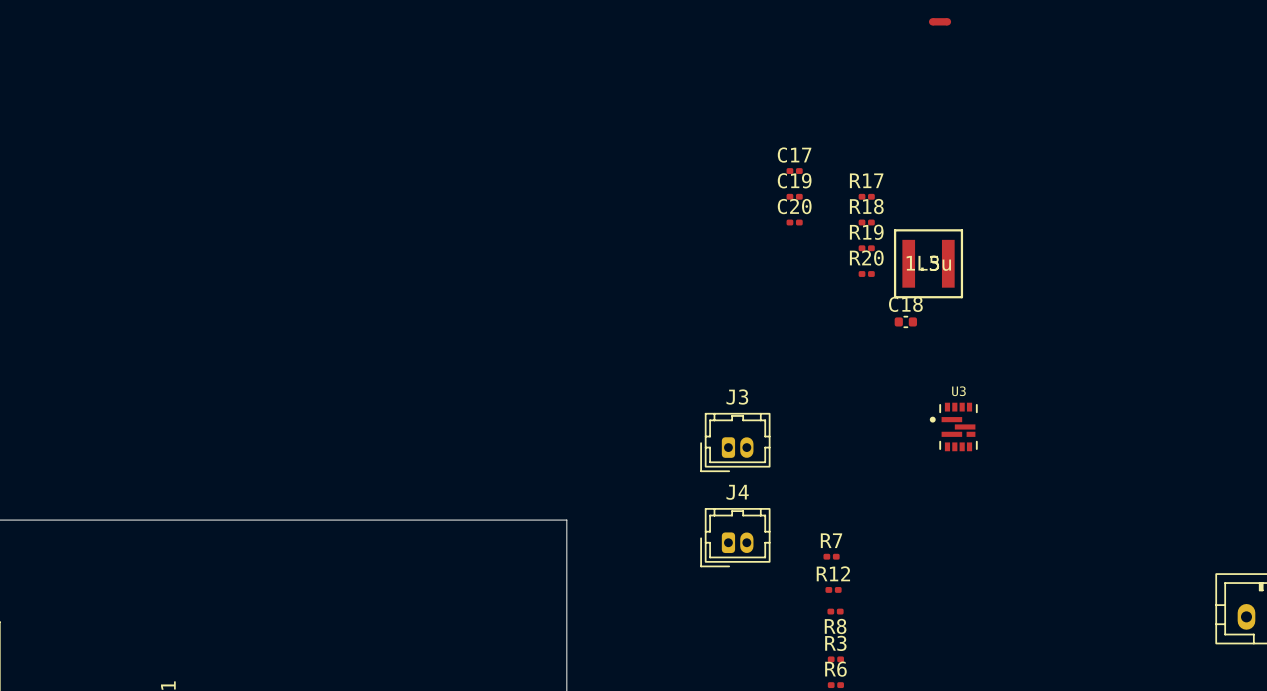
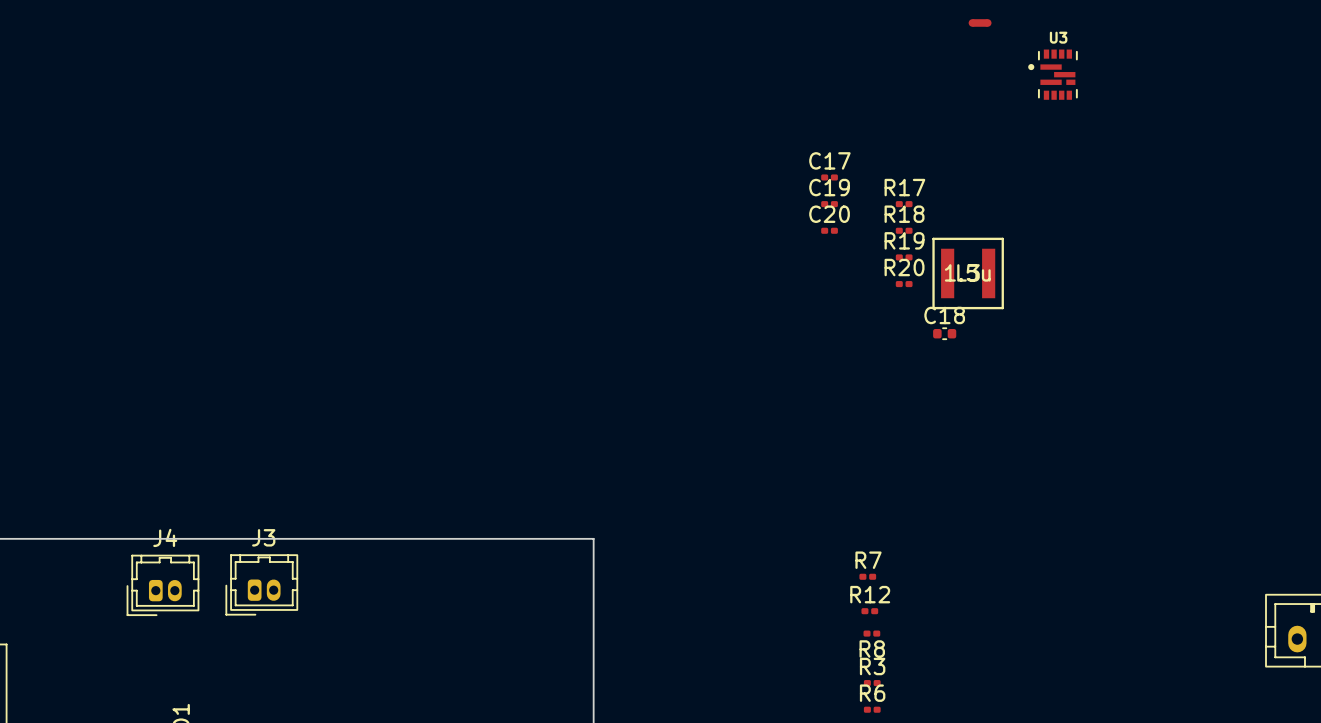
U3 position: (953, 426) -> (1053, 74)
J3 position: (735, 442) -> (261, 584)
J4 position: (735, 537) -> (162, 585)

